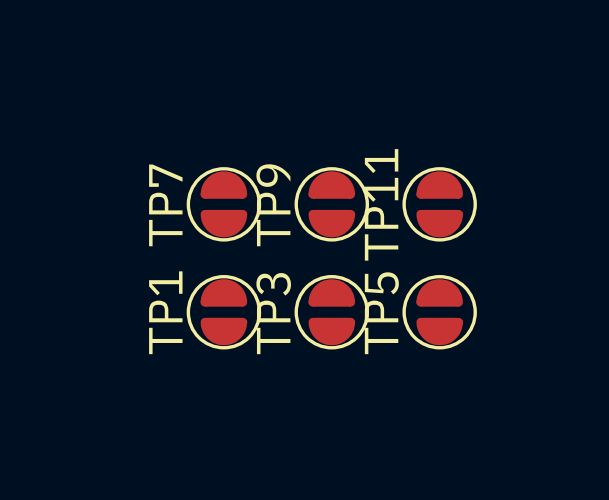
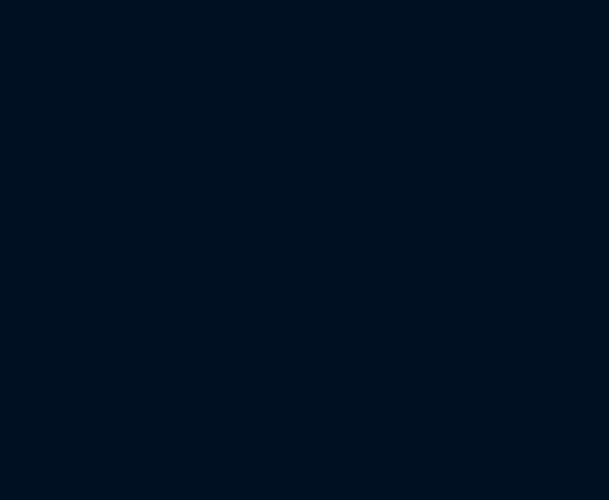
TP7: (223, 204) -> none
TP9: (331, 204) -> none
TP11: (439, 204) -> none
TP1: (223, 312) -> none
TP3: (331, 312) -> none
TP5: (439, 312) -> none

